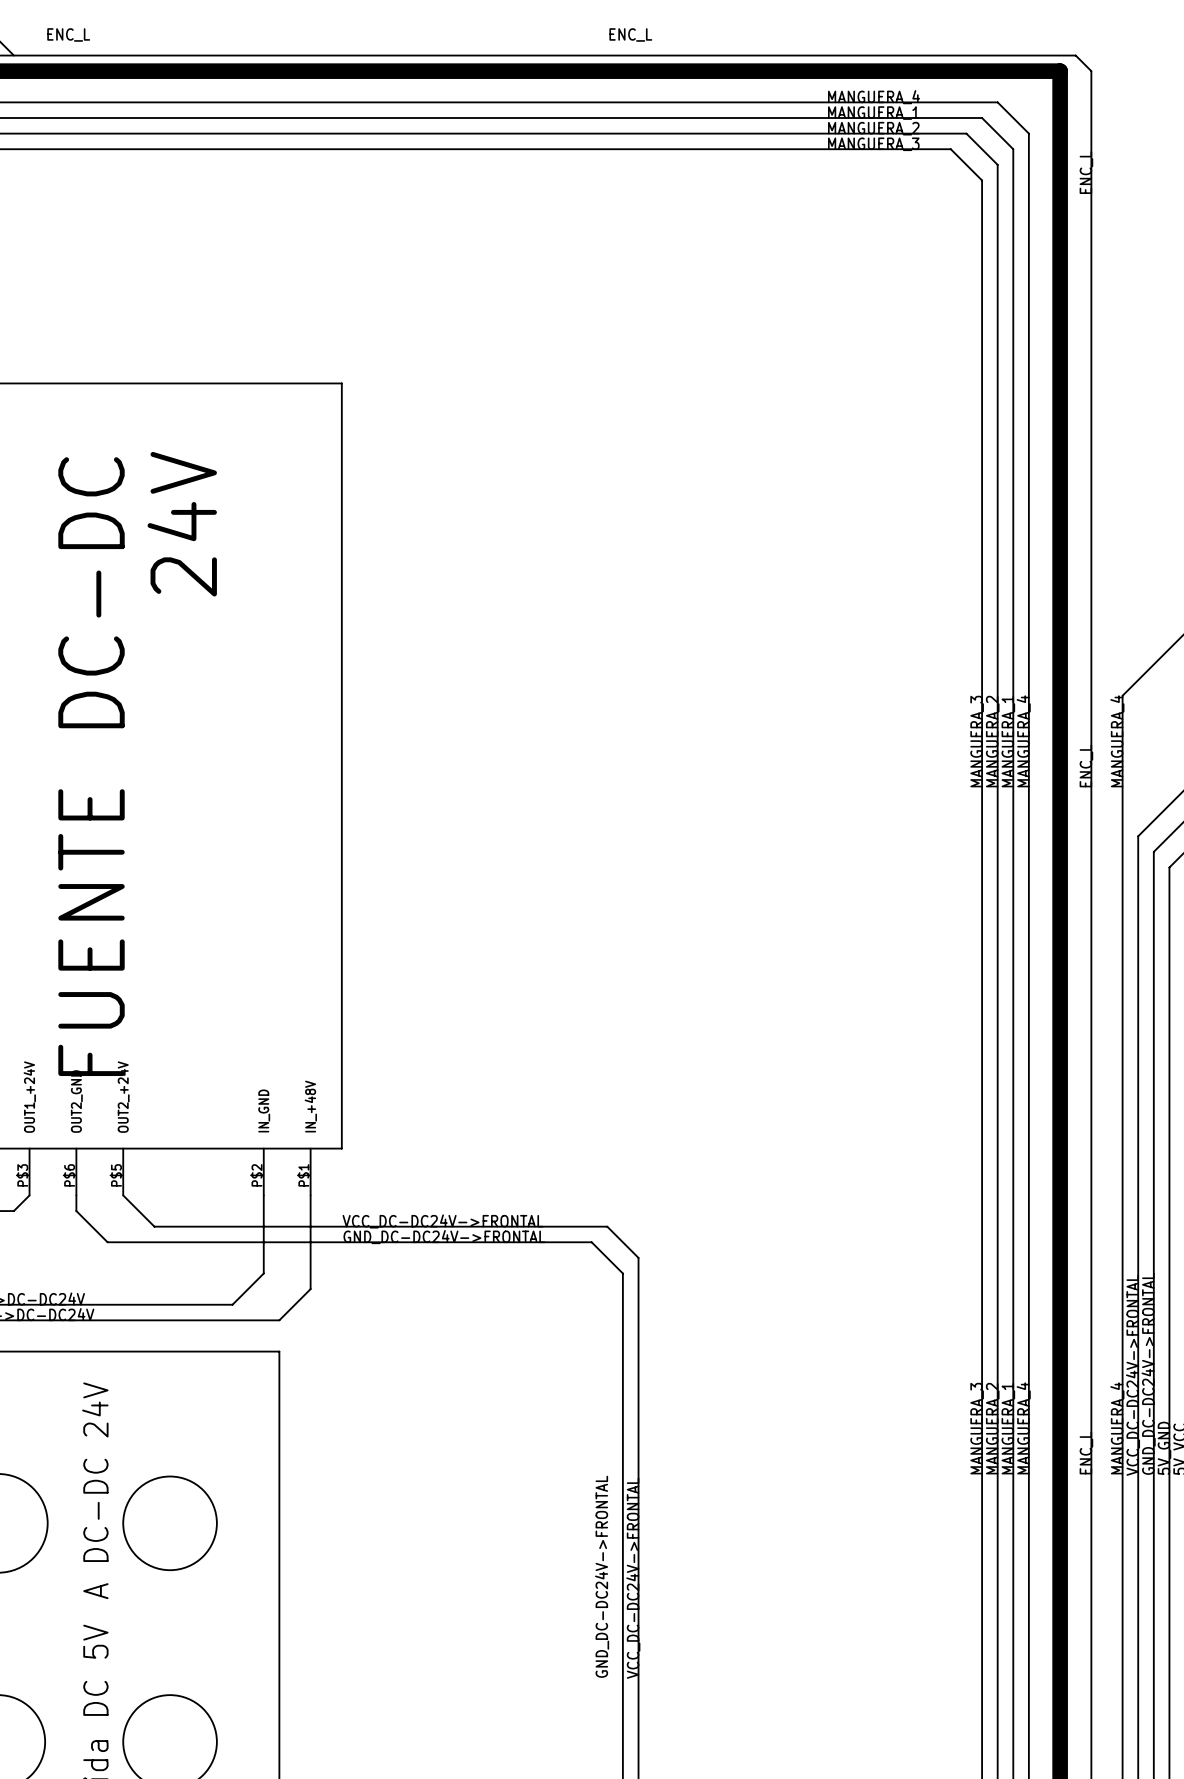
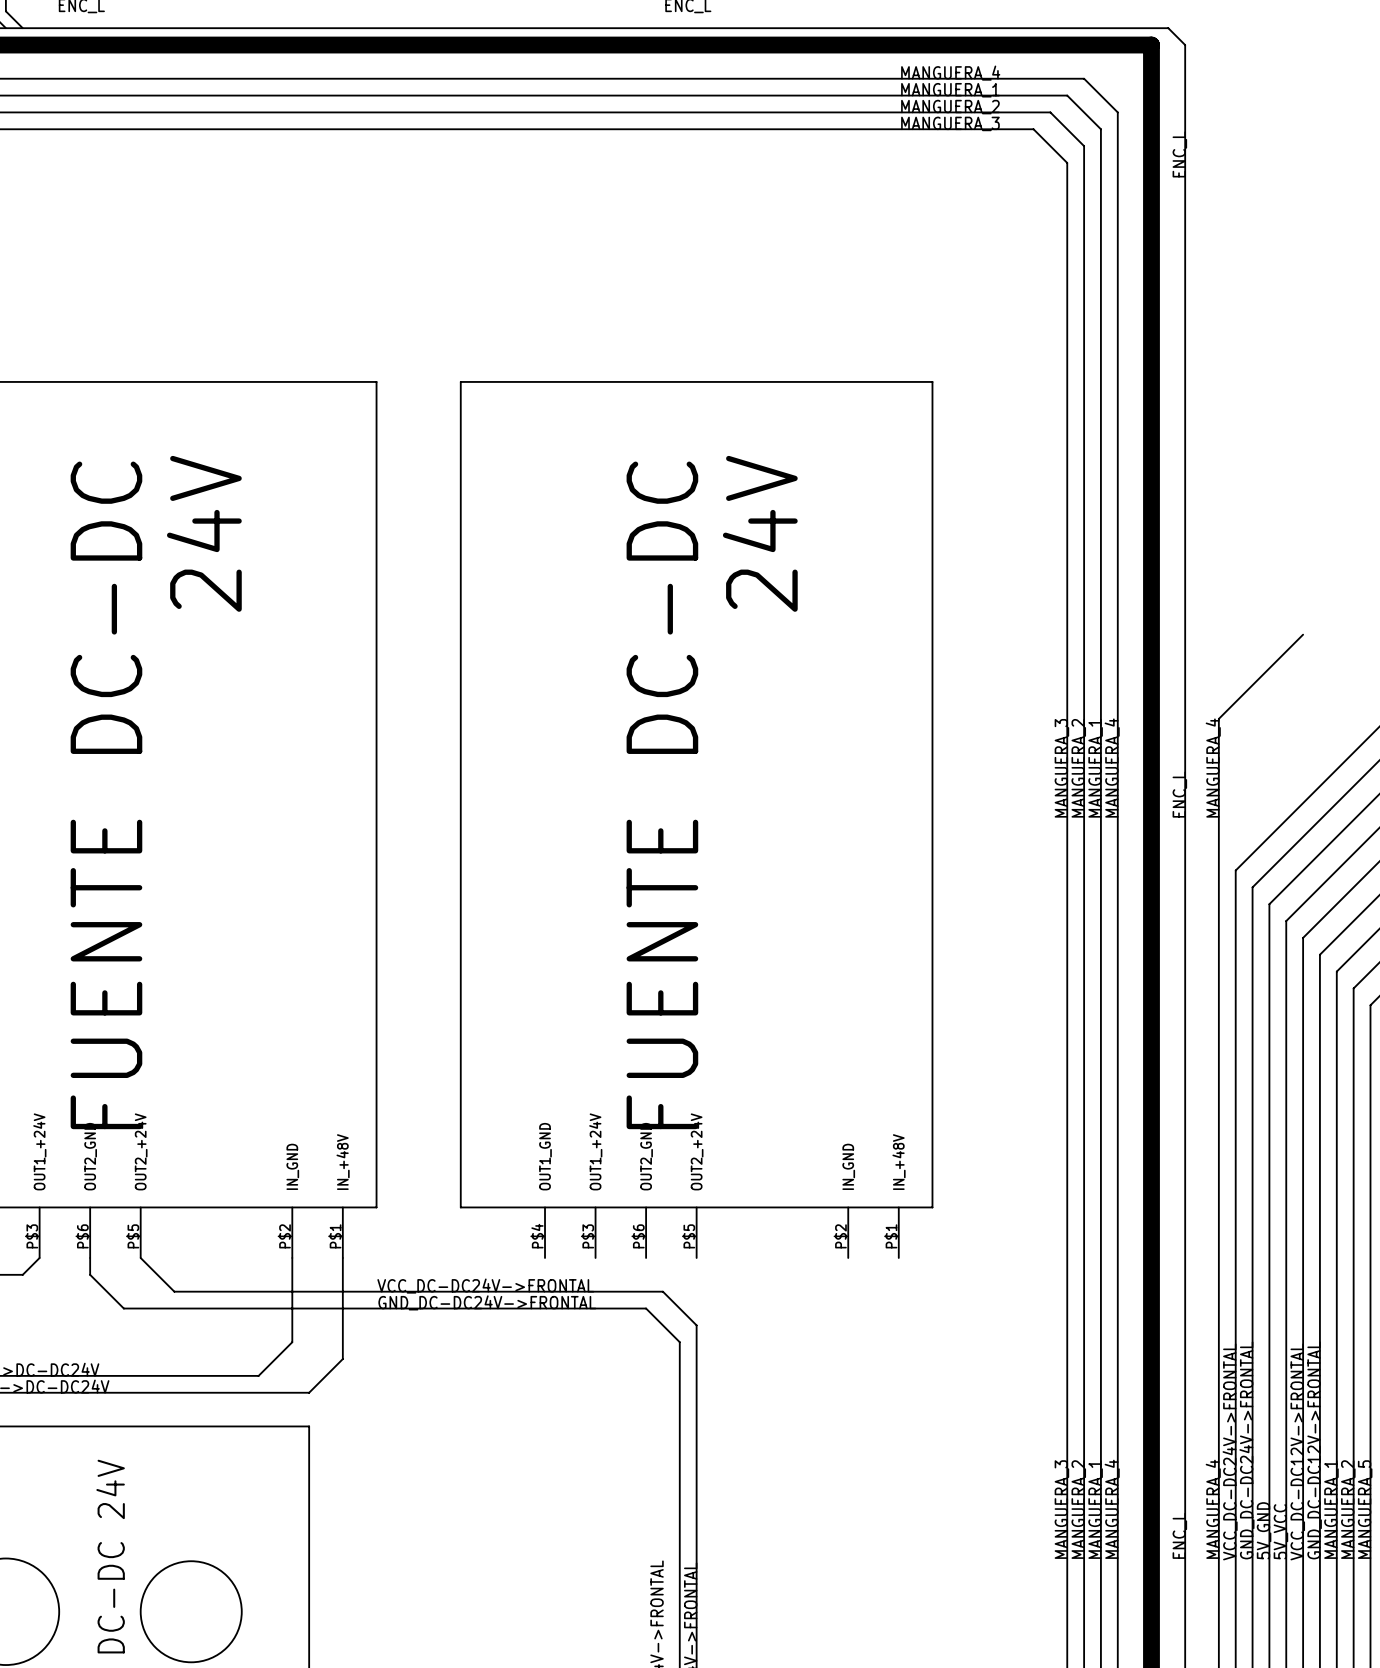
part: none -> (696, 819)

